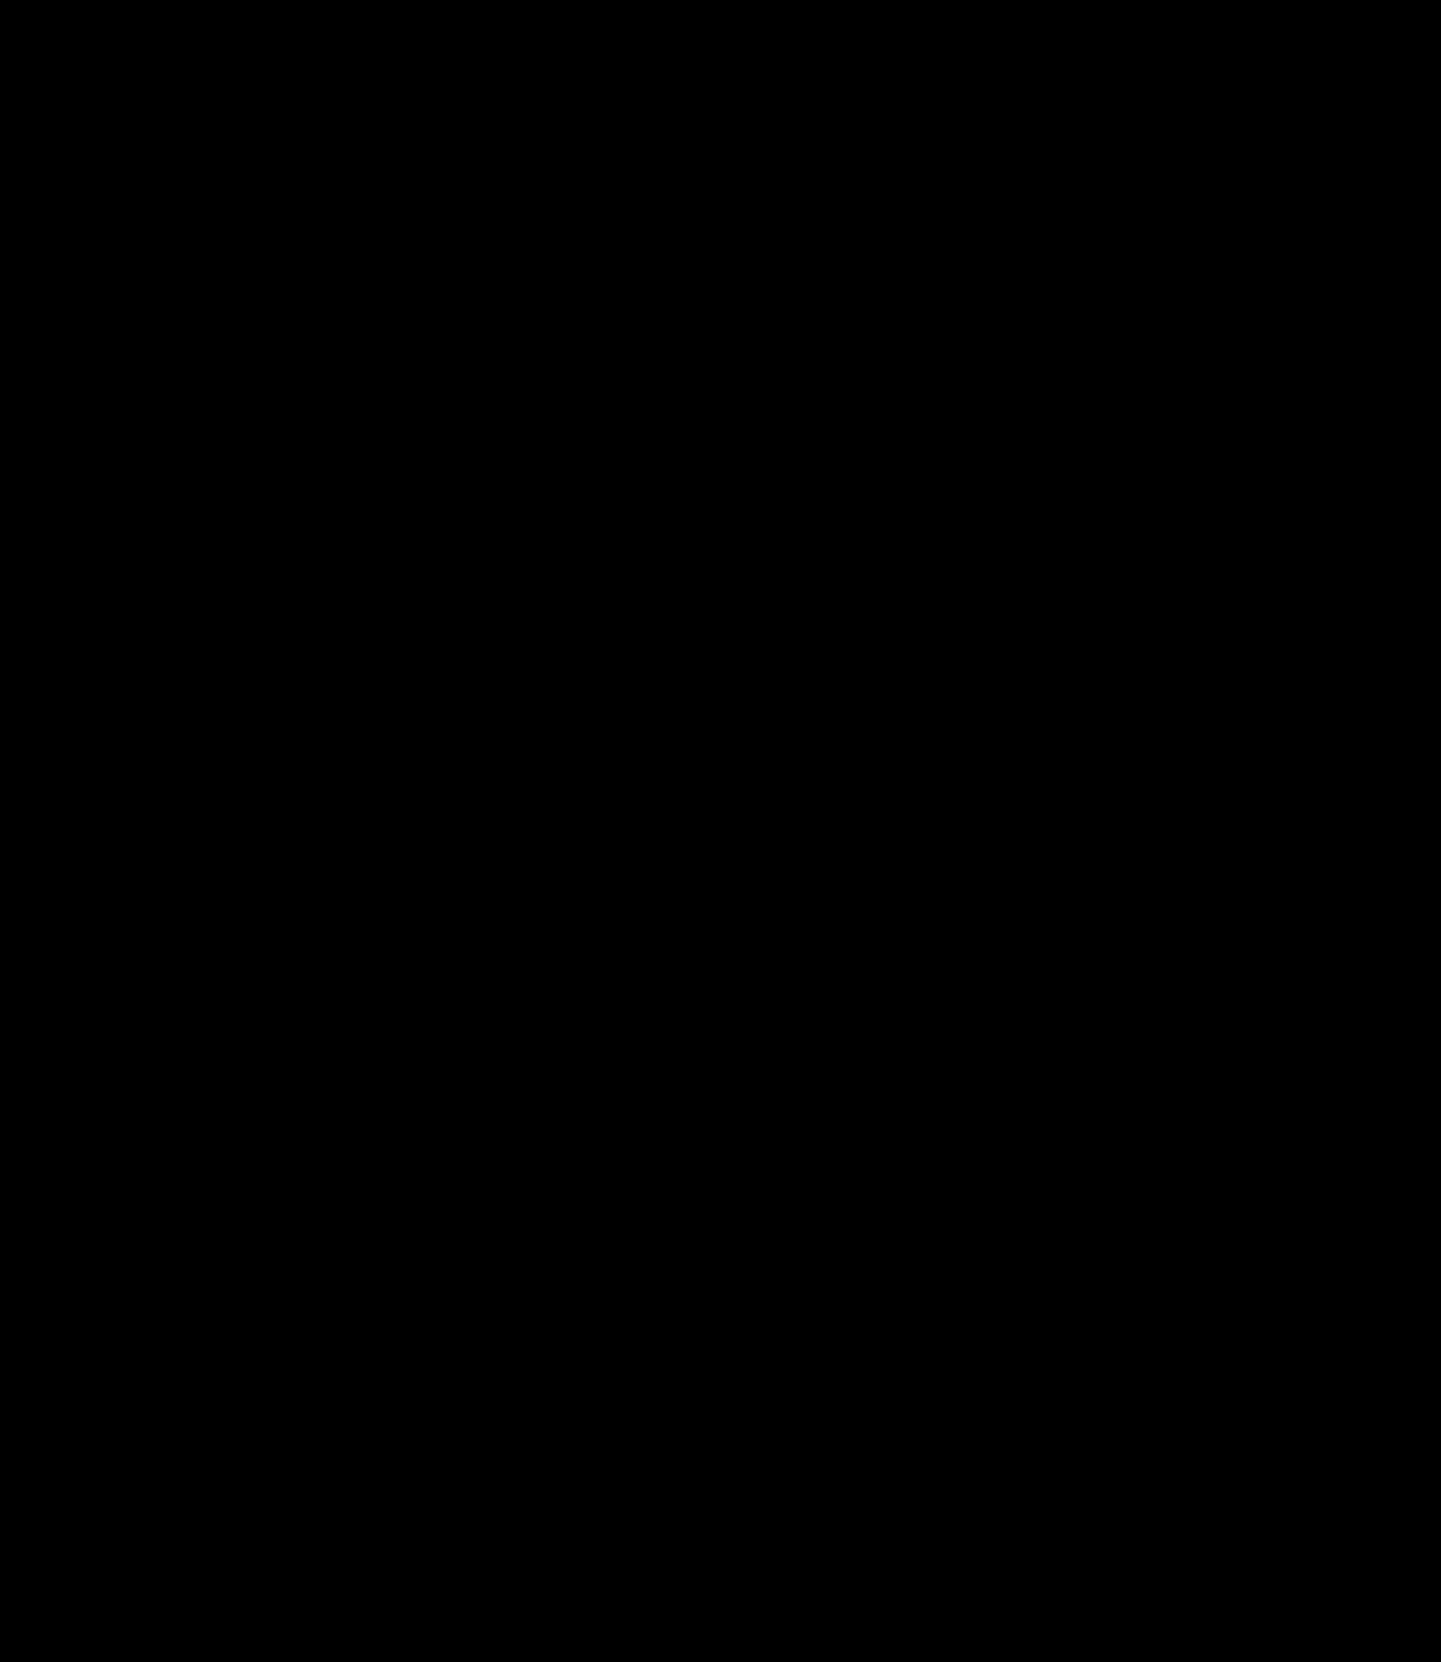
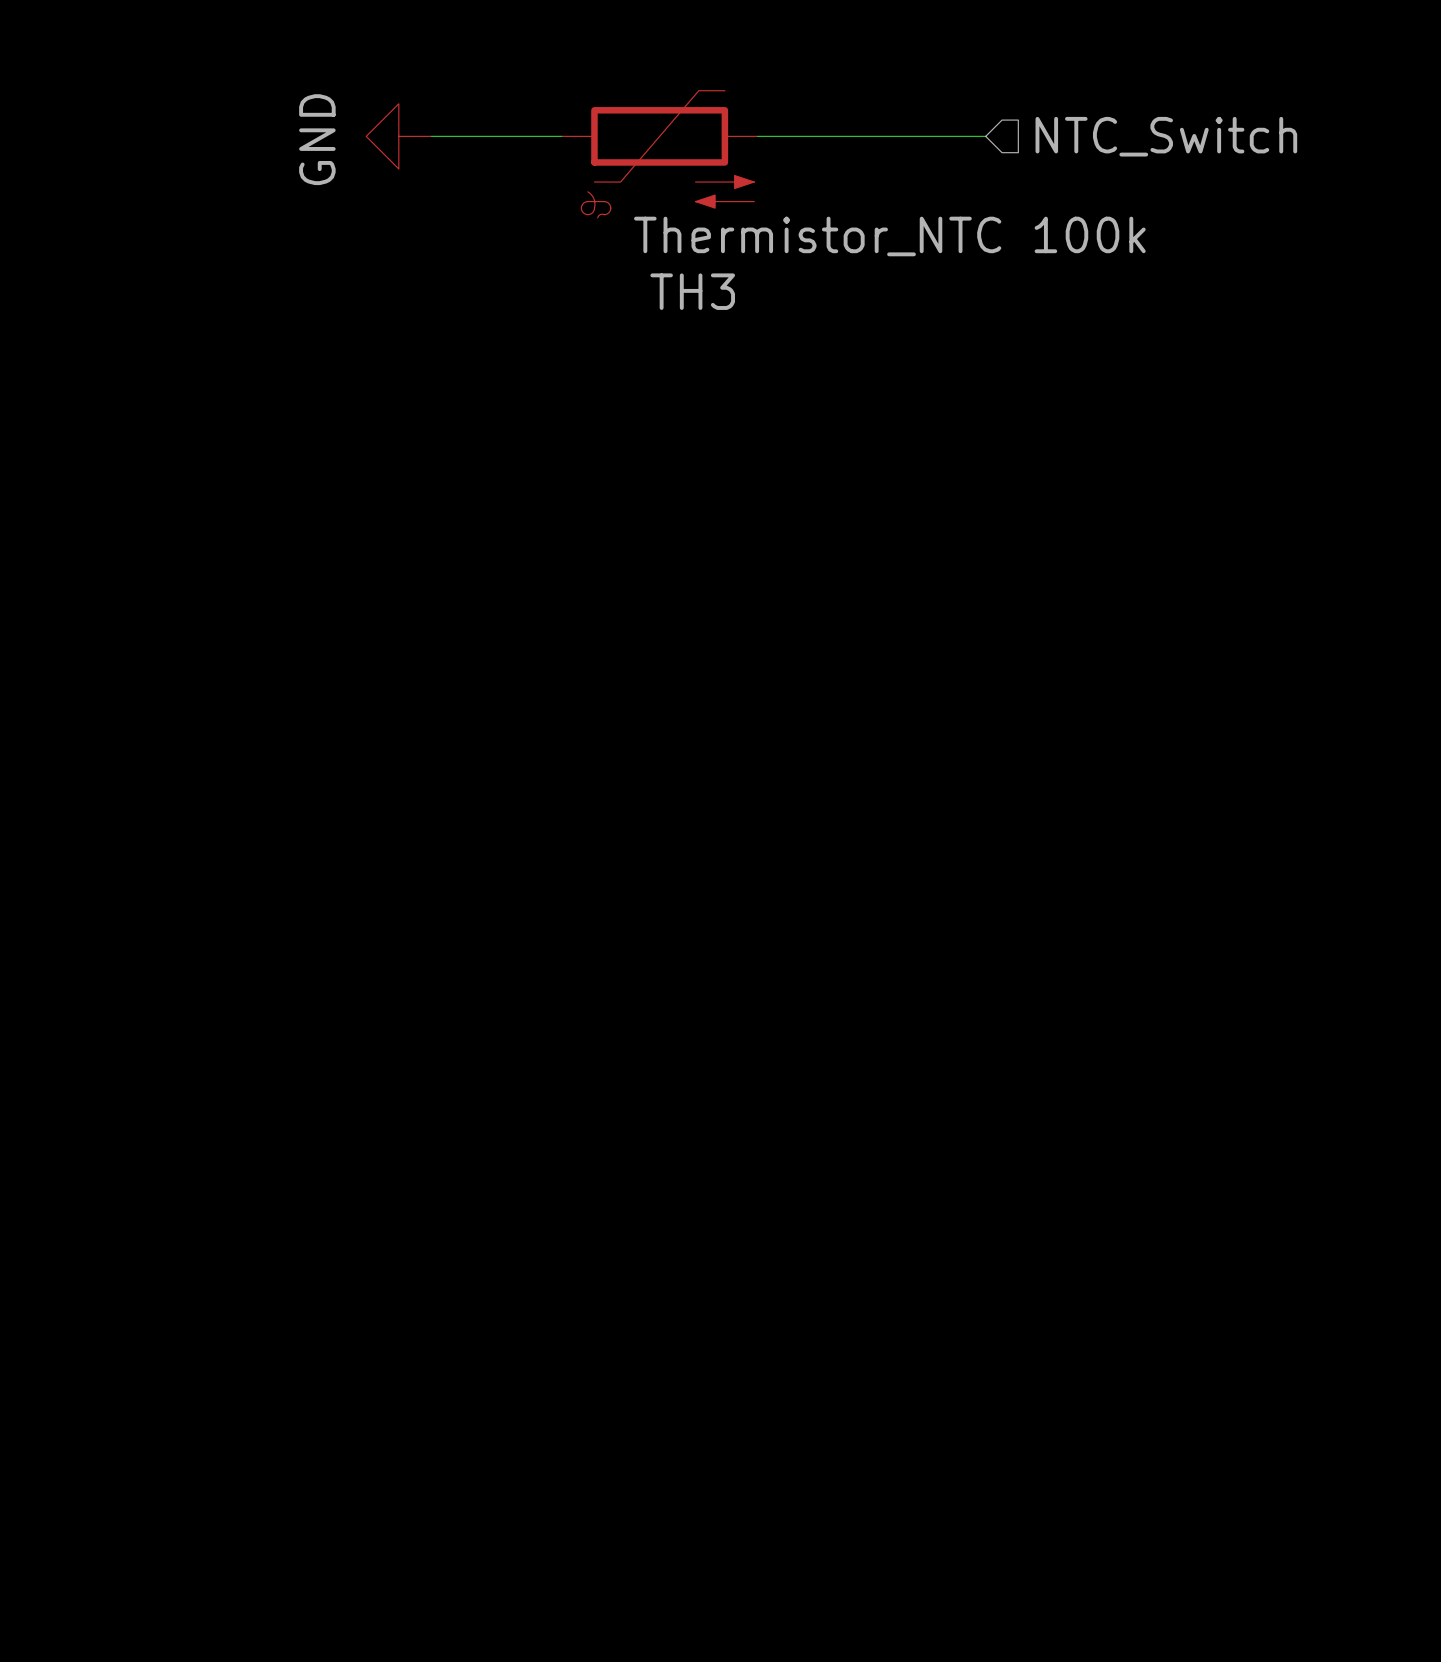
power symbol: none -> GND (398, 136)
wire: none -> (431, 136) (561, 136)
wire: none -> (757, 136) (985, 136)
hierarchical label: none -> NTC_Switch (1166, 136)
TH3: none -> Thermistor_NTC 100k (659, 154)

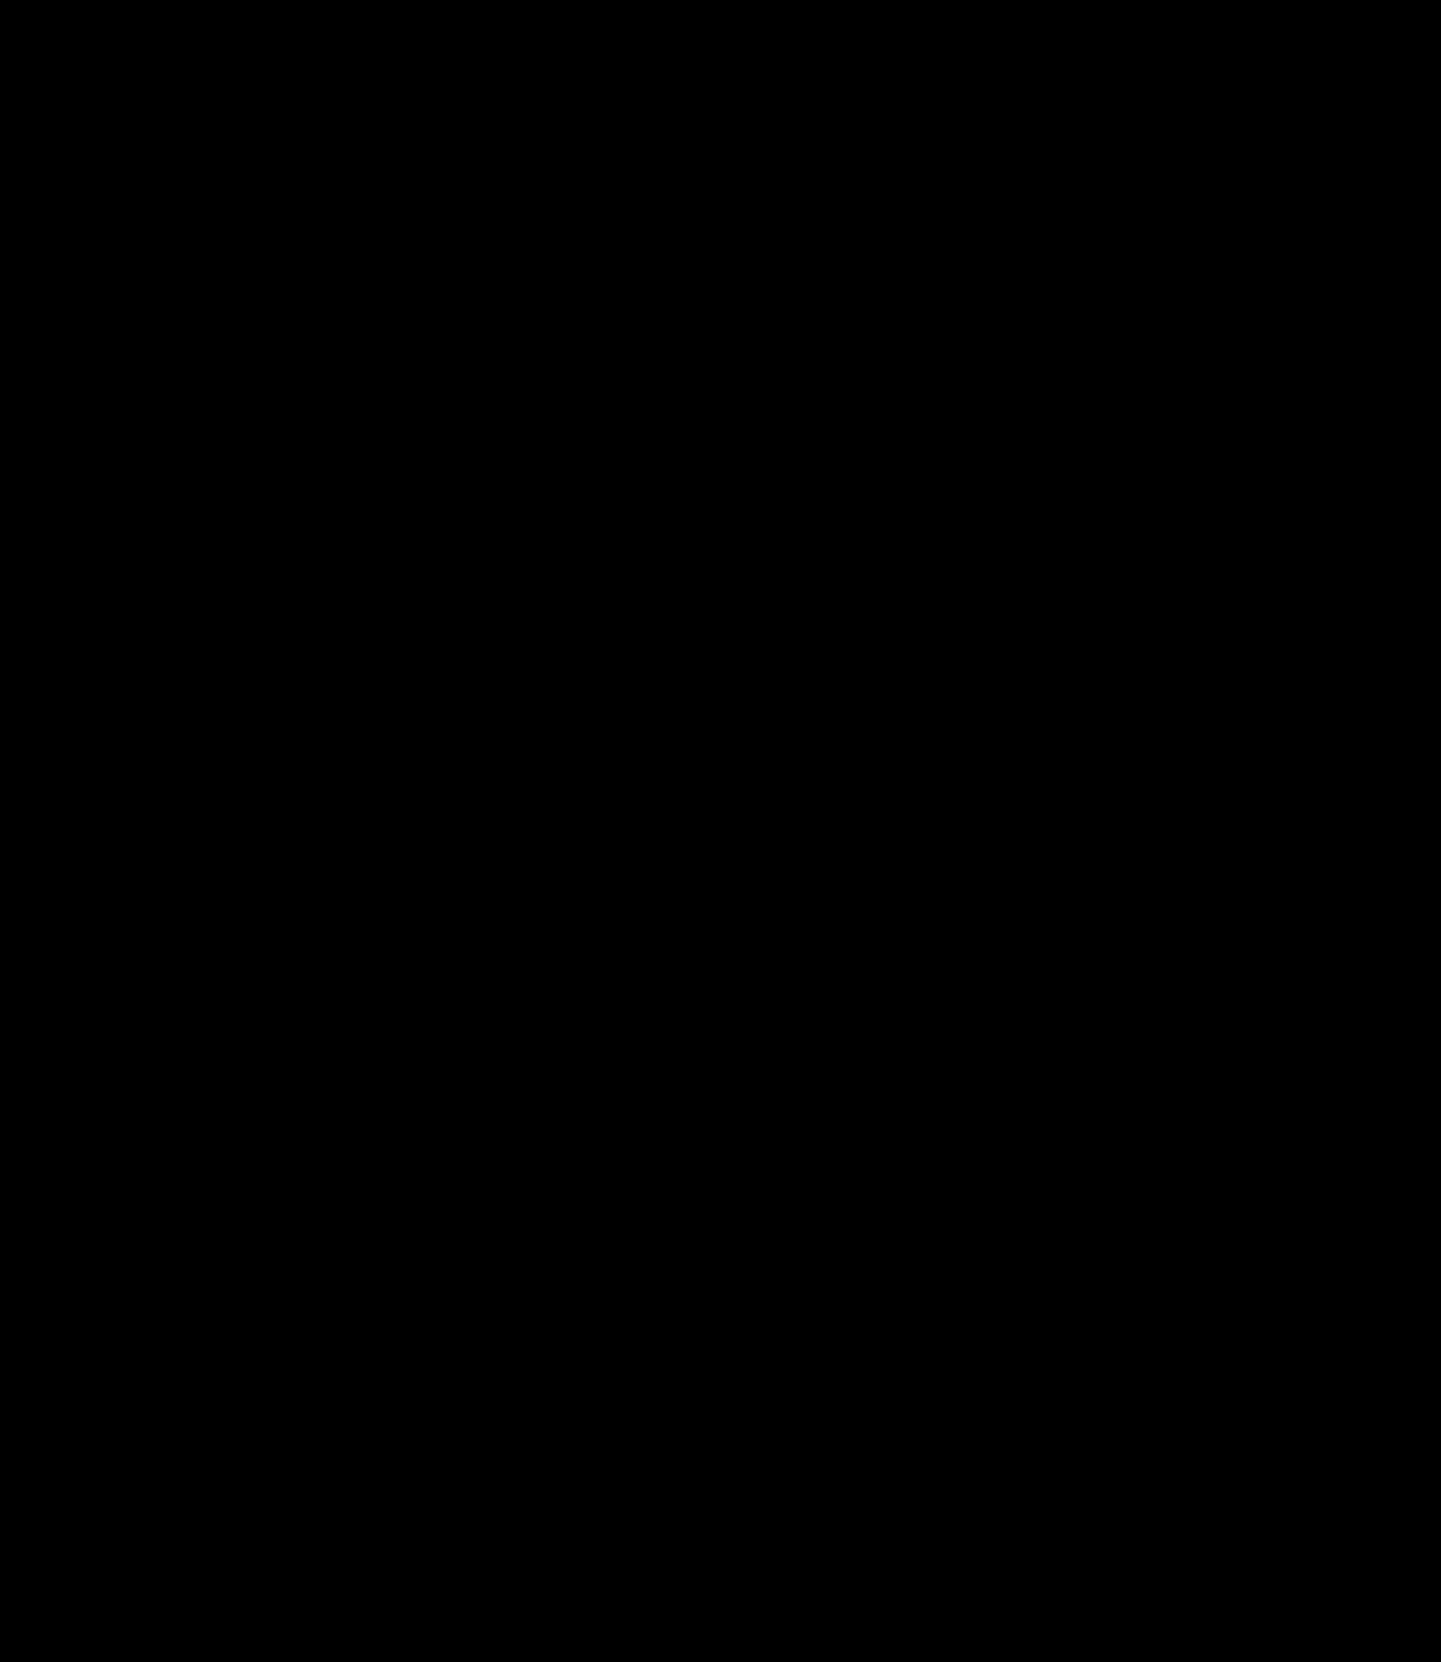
power symbol: GND (398, 136) -> none
wire: (431, 136) (561, 136) -> none
wire: (757, 136) (985, 136) -> none
hierarchical label: NTC_Switch (1166, 136) -> none
TH3: Thermistor_NTC 100k (659, 154) -> none

